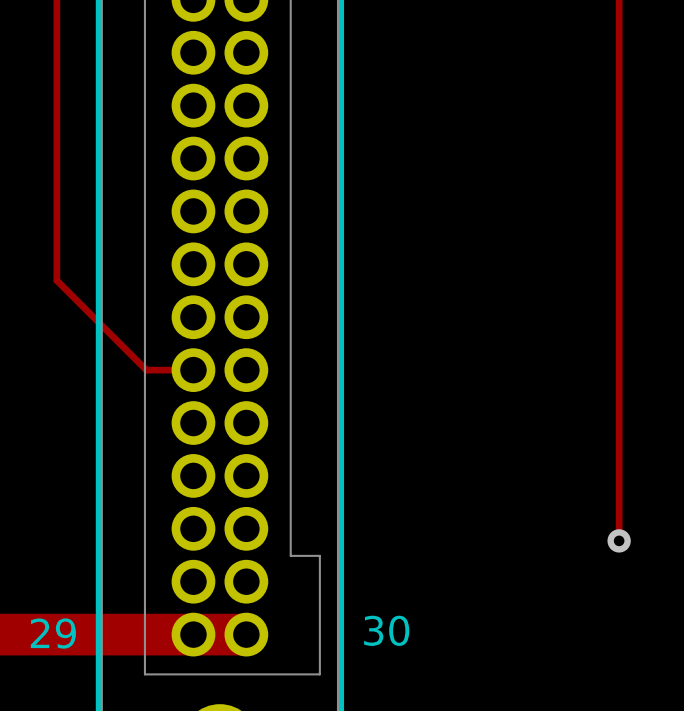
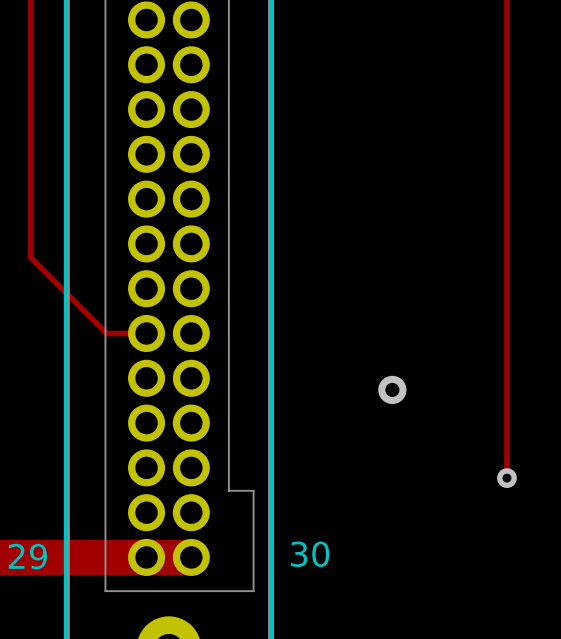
via: none -> (392, 389)

